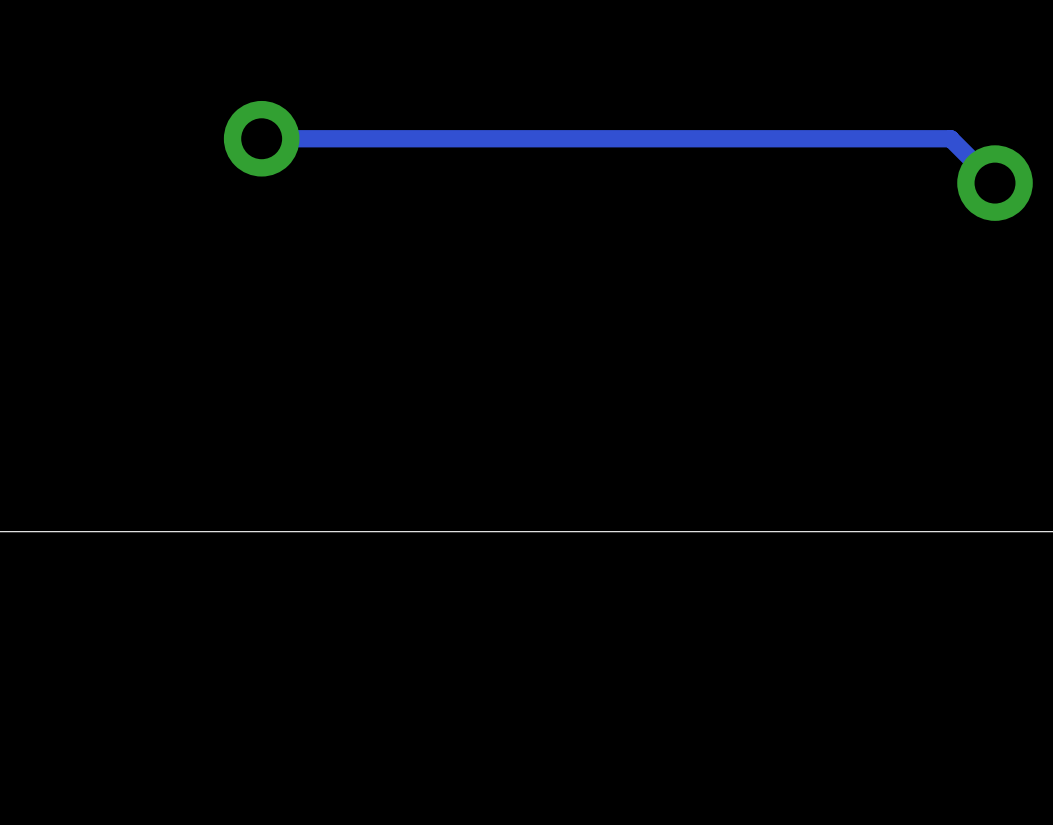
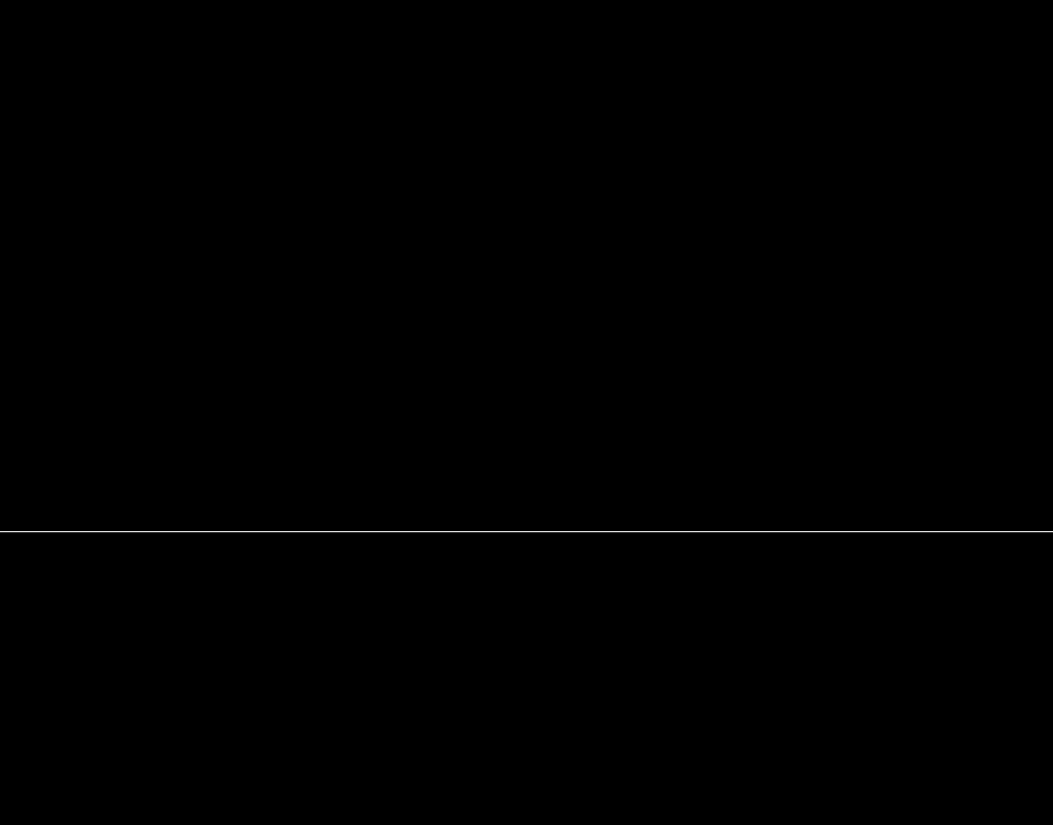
track: (261, 138) (950, 138) (995, 183) -> none
via: (261, 138) -> none
via: (995, 183) -> none

